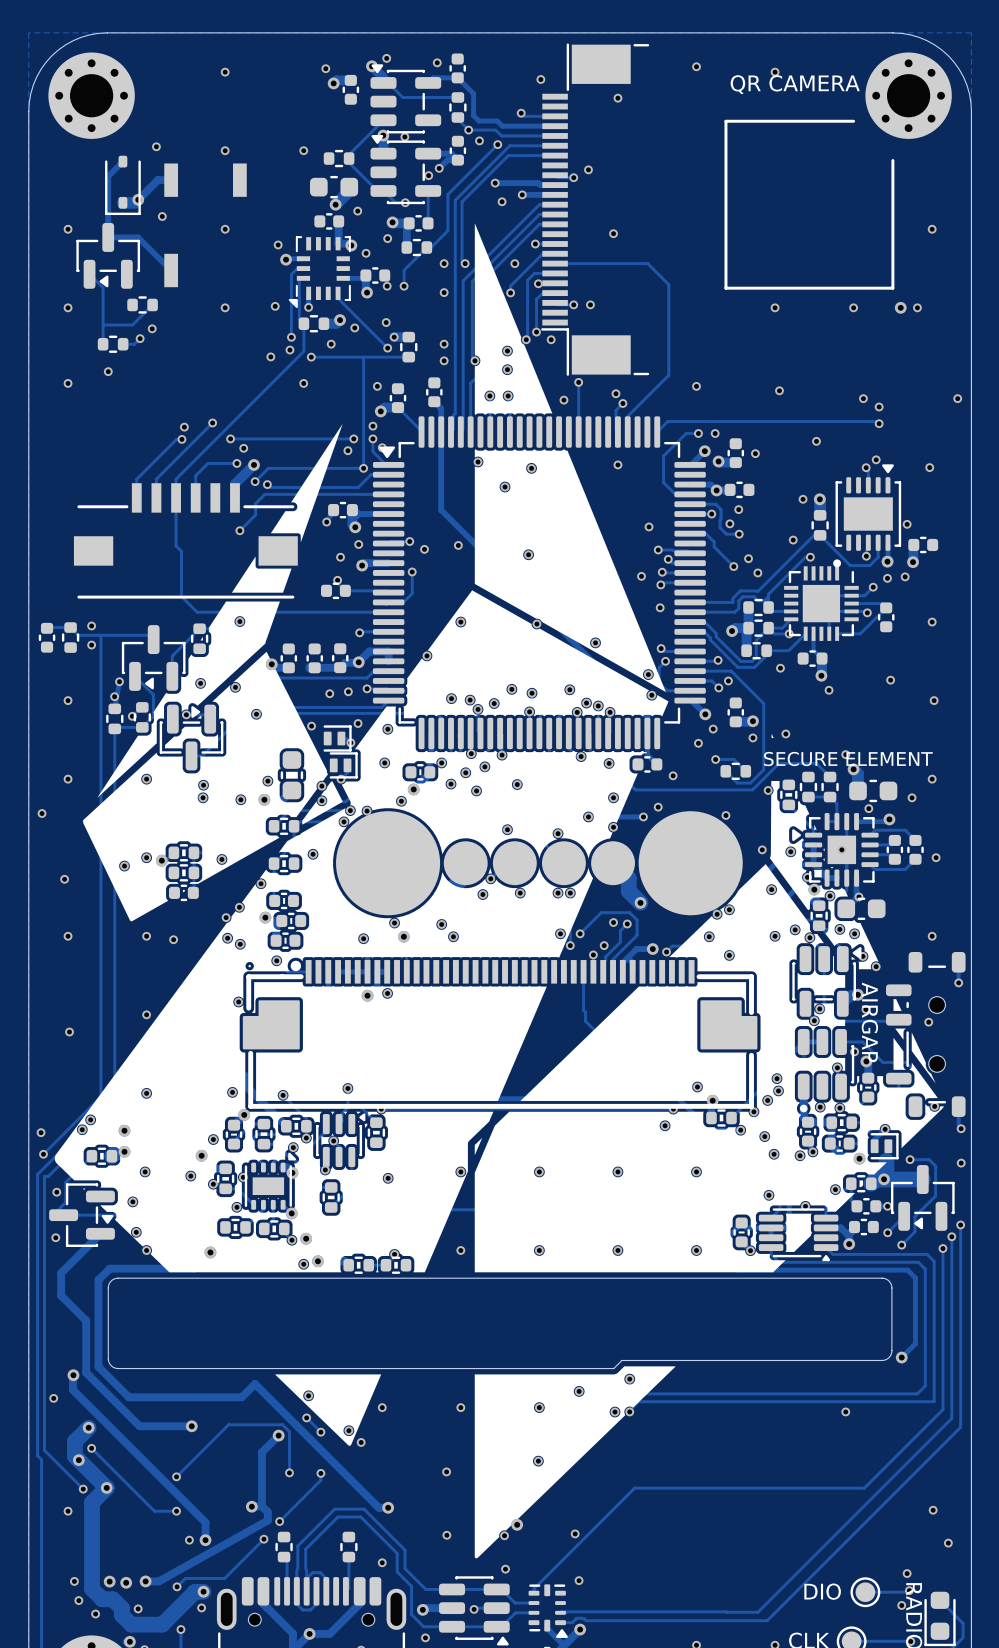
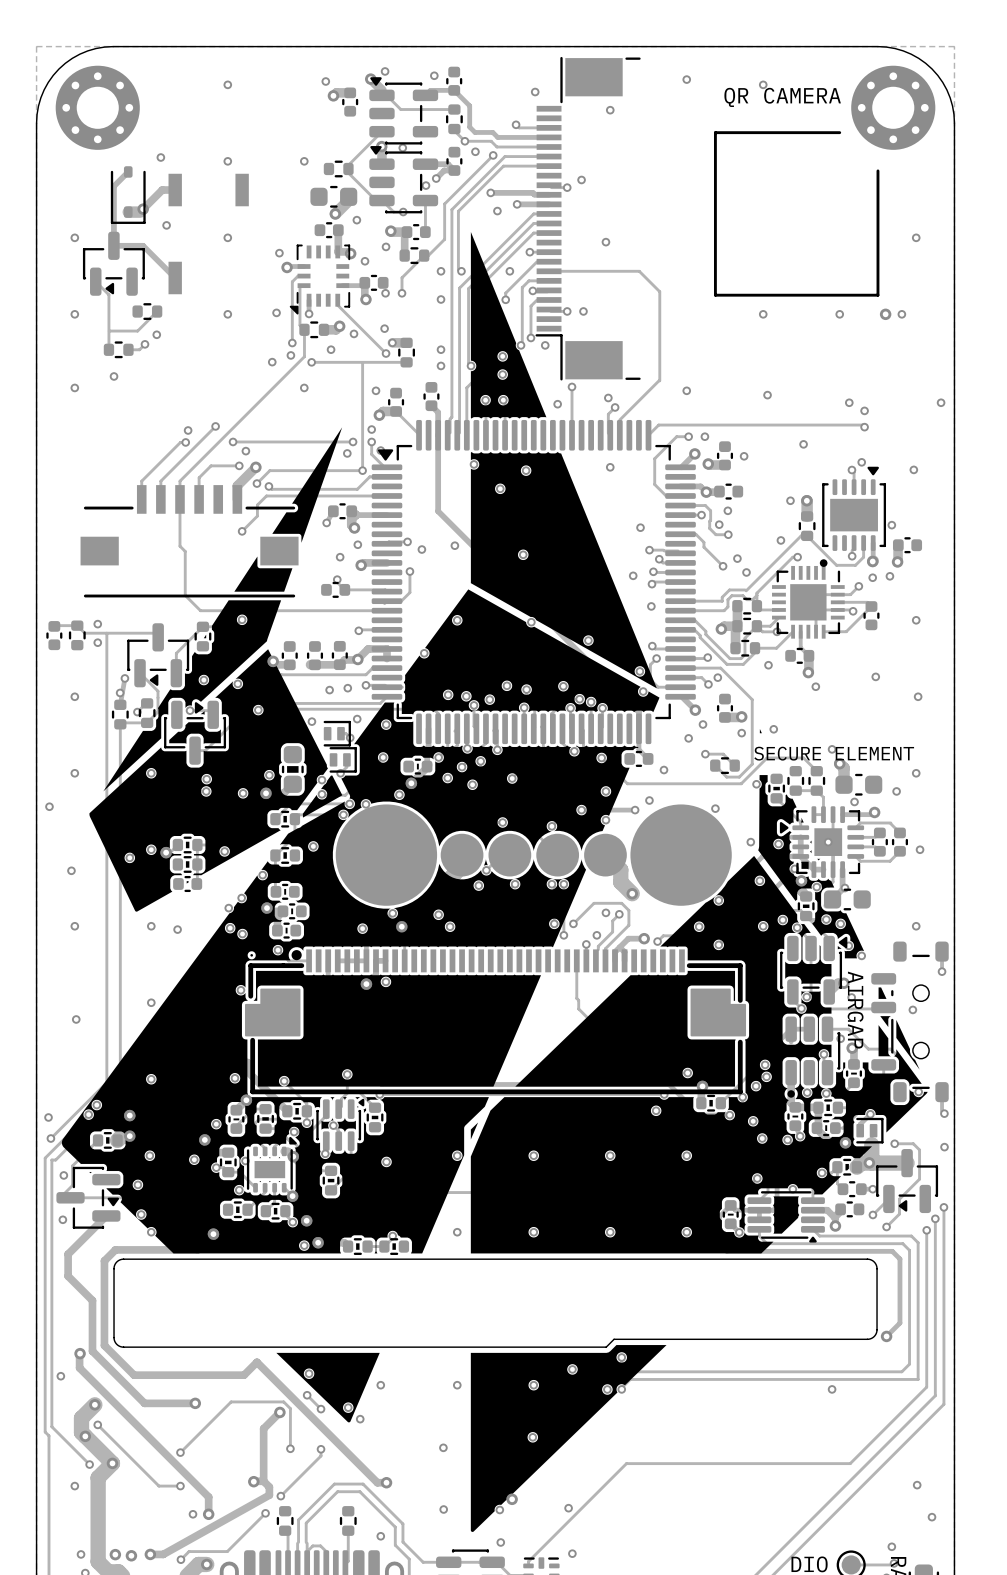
drawing shape: [474, 864, 944, 1273] -> [470, 855, 928, 1254]
via: (717, 914) -> none

